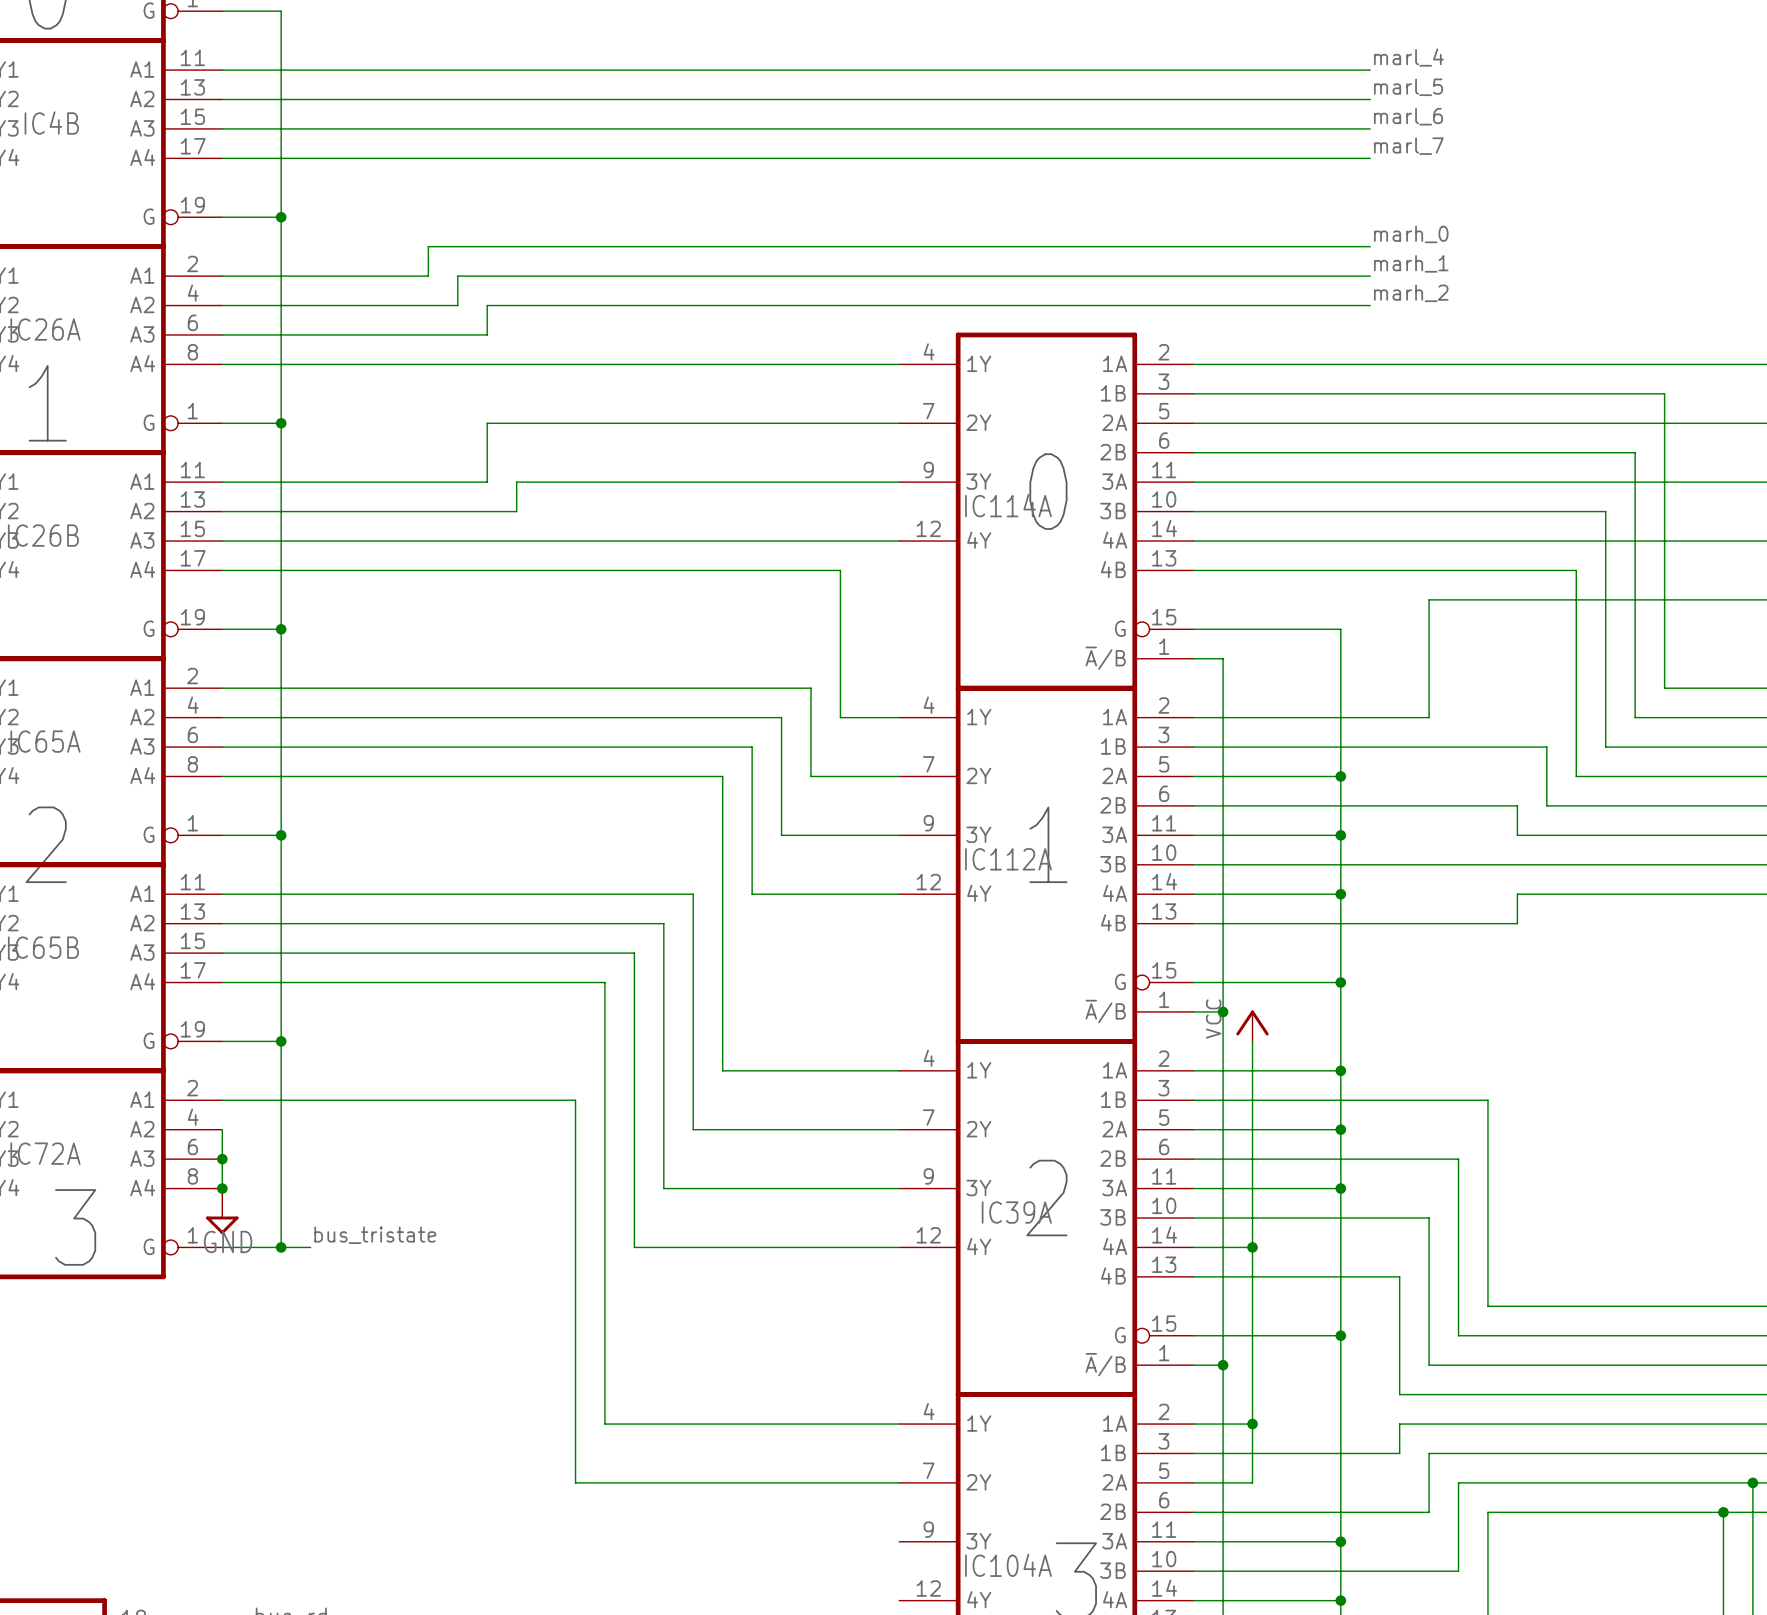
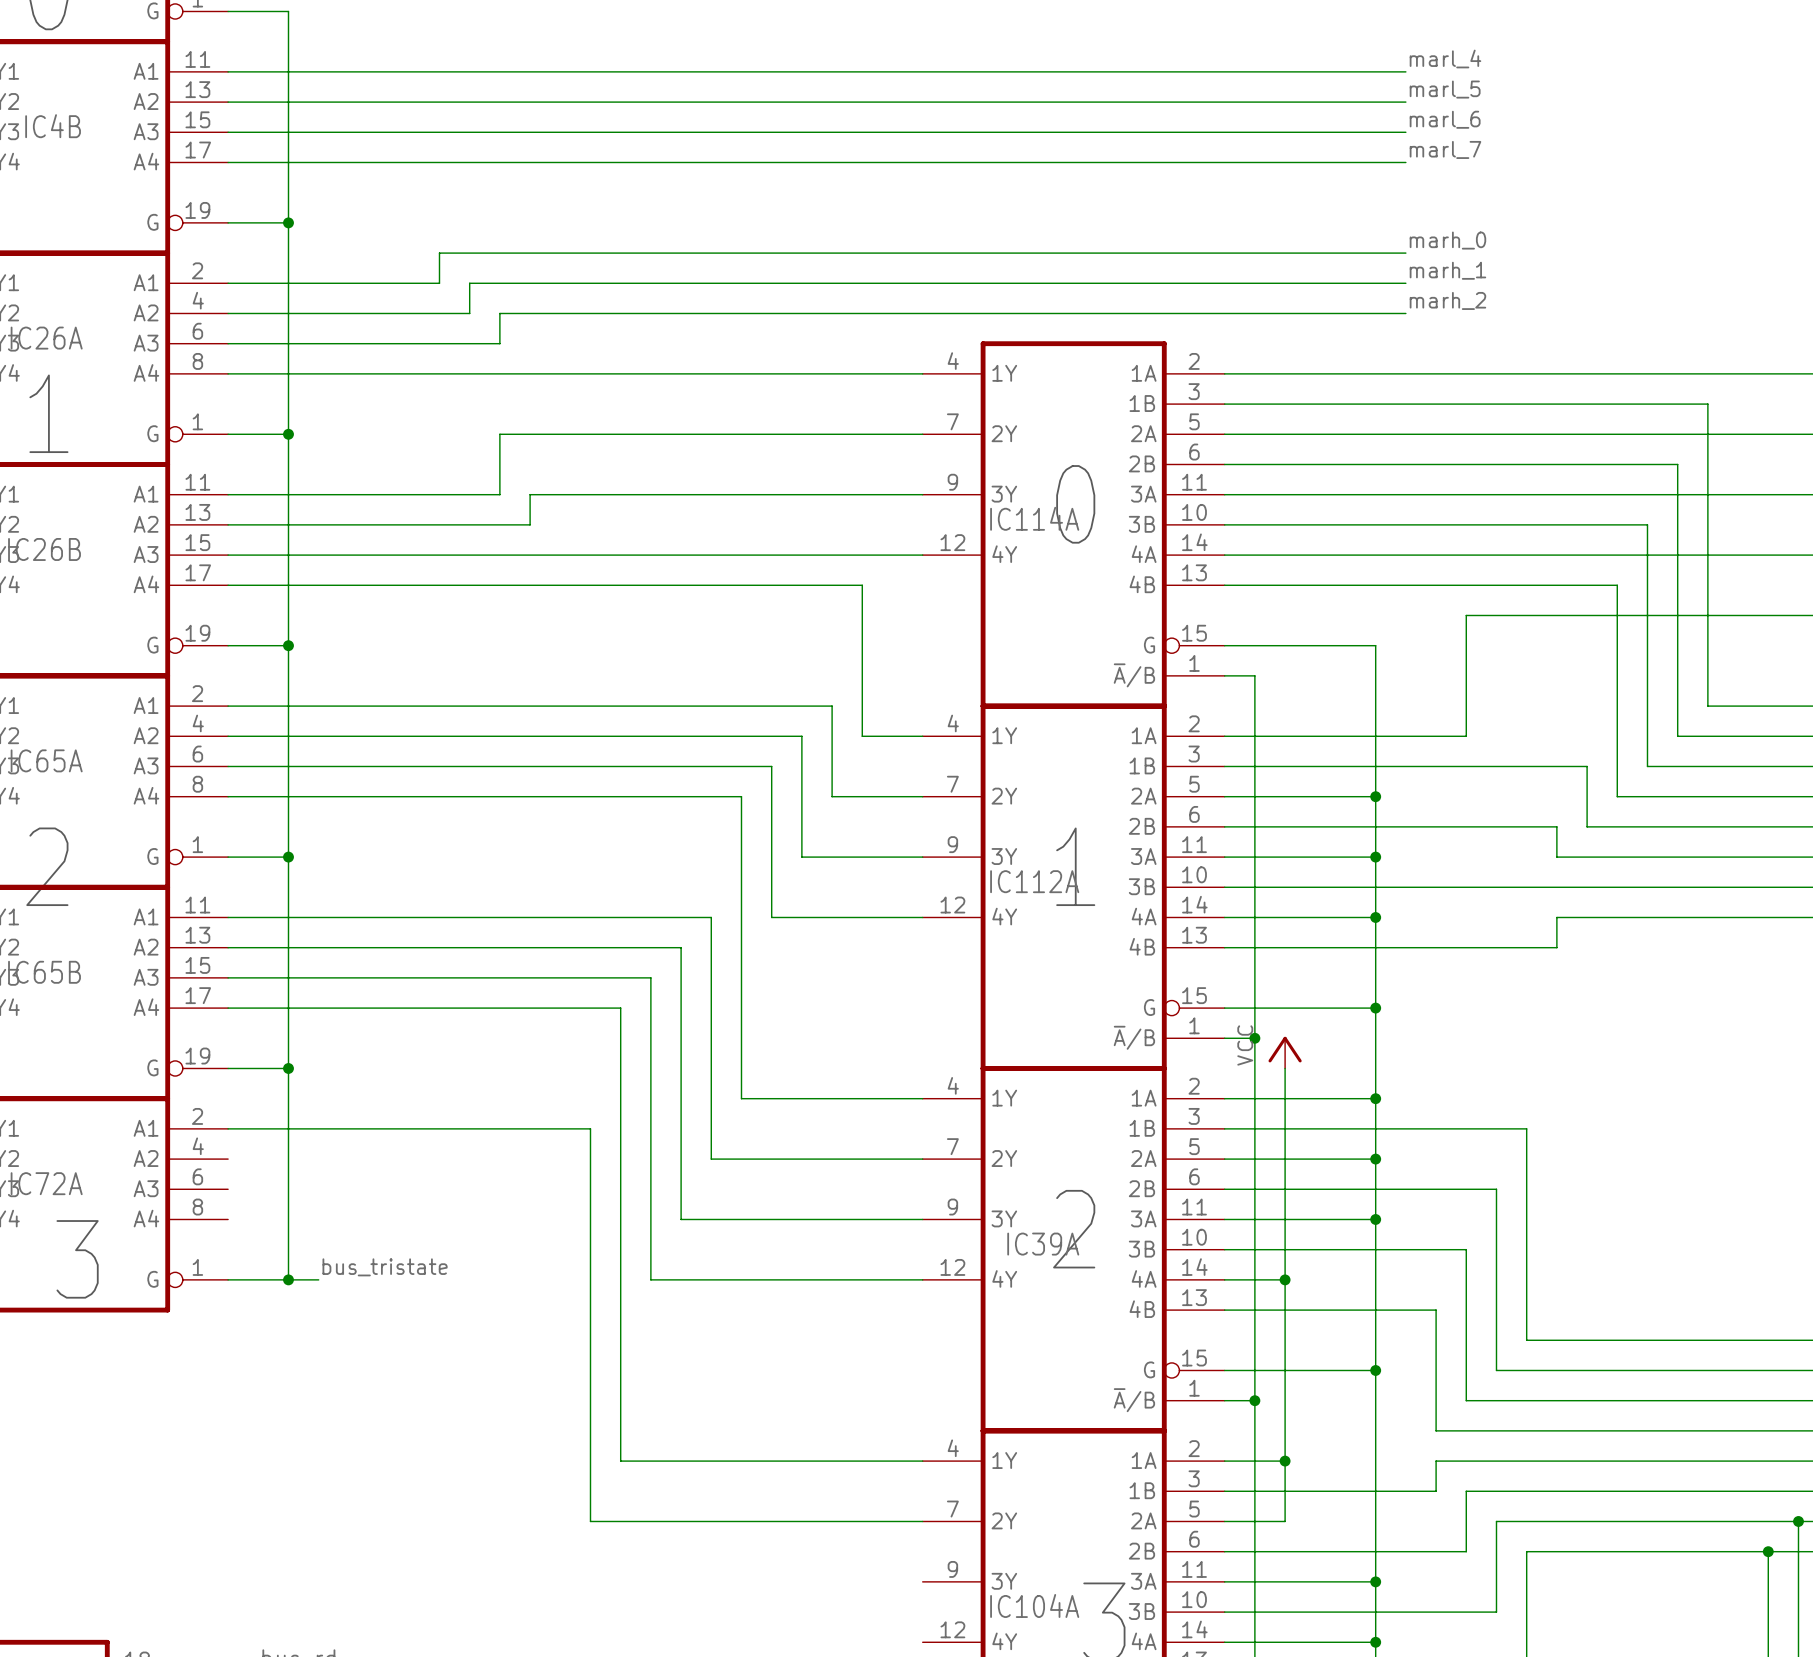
wire: (222, 1129) (222, 1188) -> none
junction: (222, 1159) -> none
junction: (222, 1188) -> none
power symbol: GND (222, 1211) -> none

